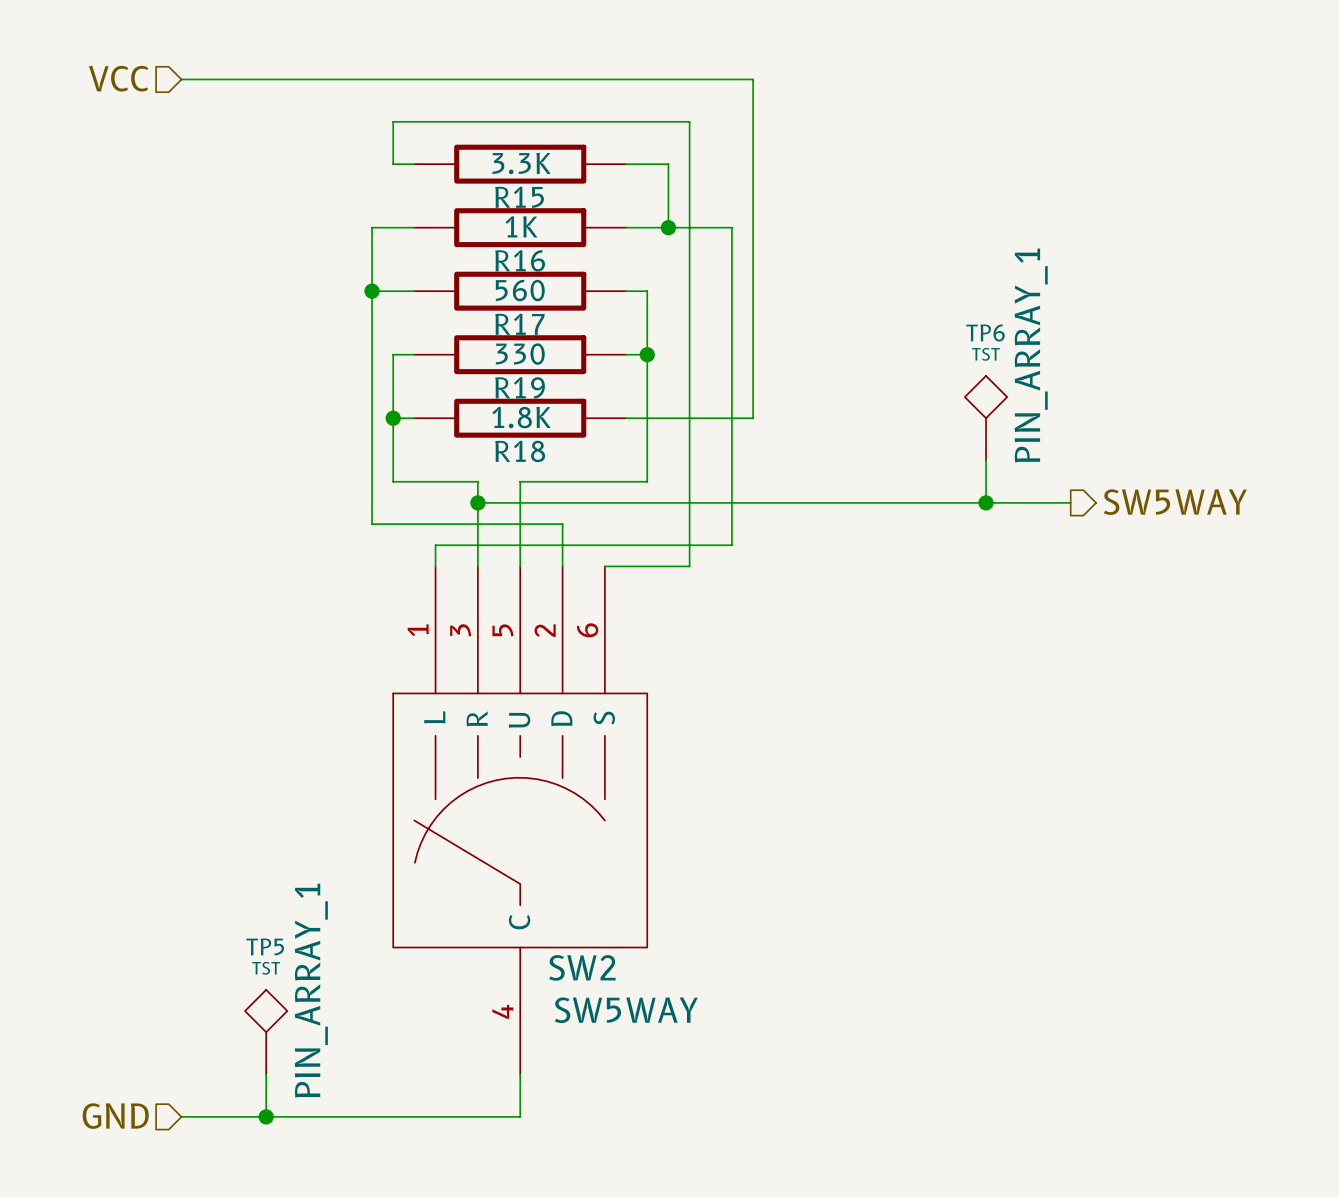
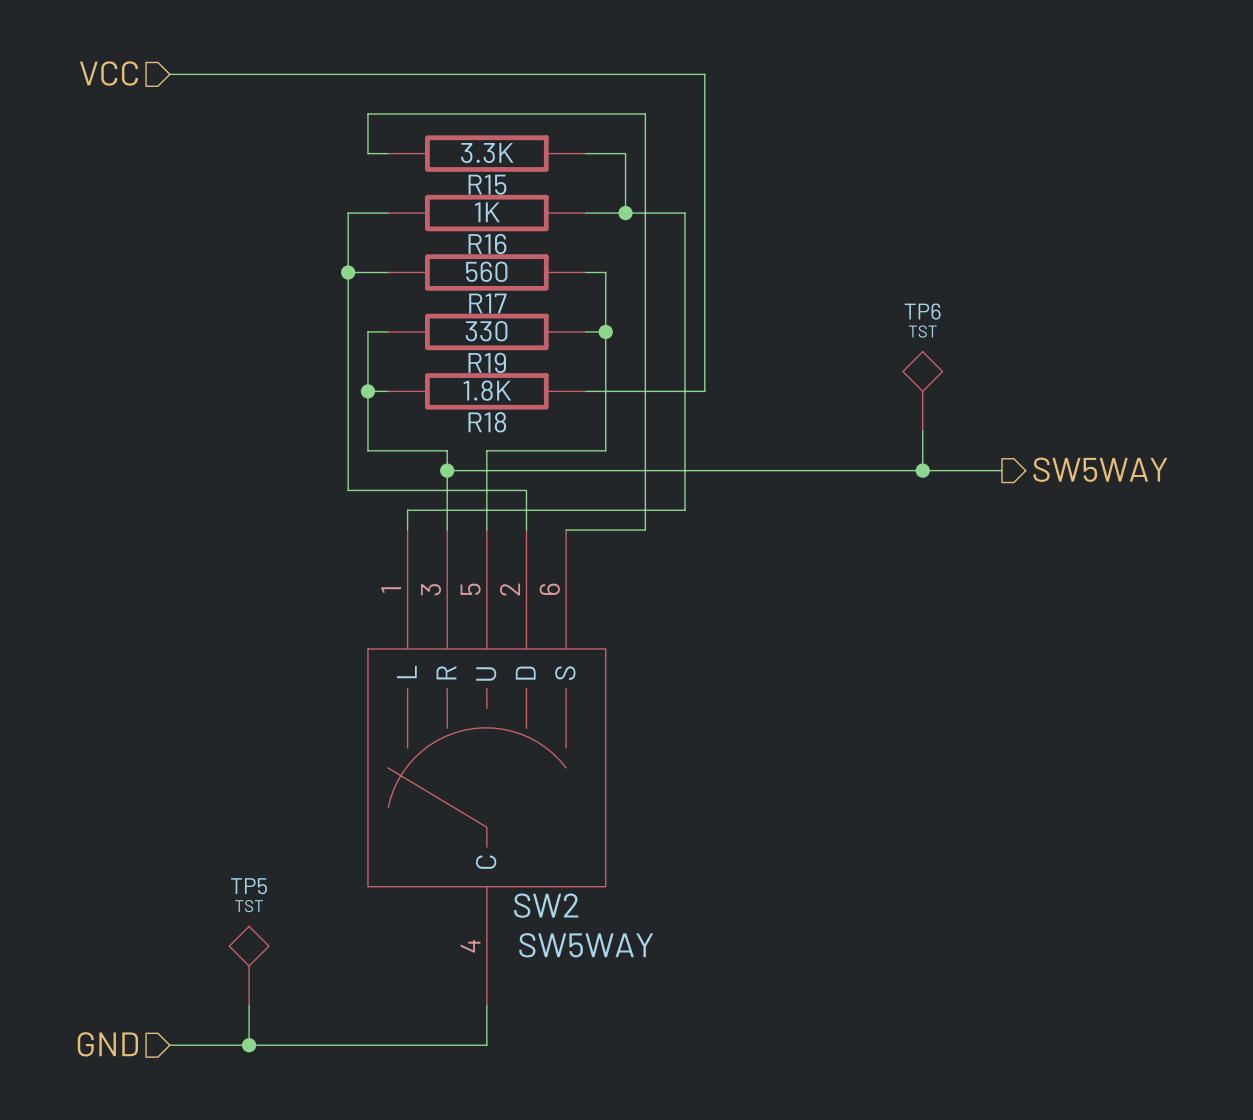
TP6 text: PIN_ARRAY_1 (1031, 355) -> none
TP5 text: PIN_ARRAY_1 (311, 990) -> none

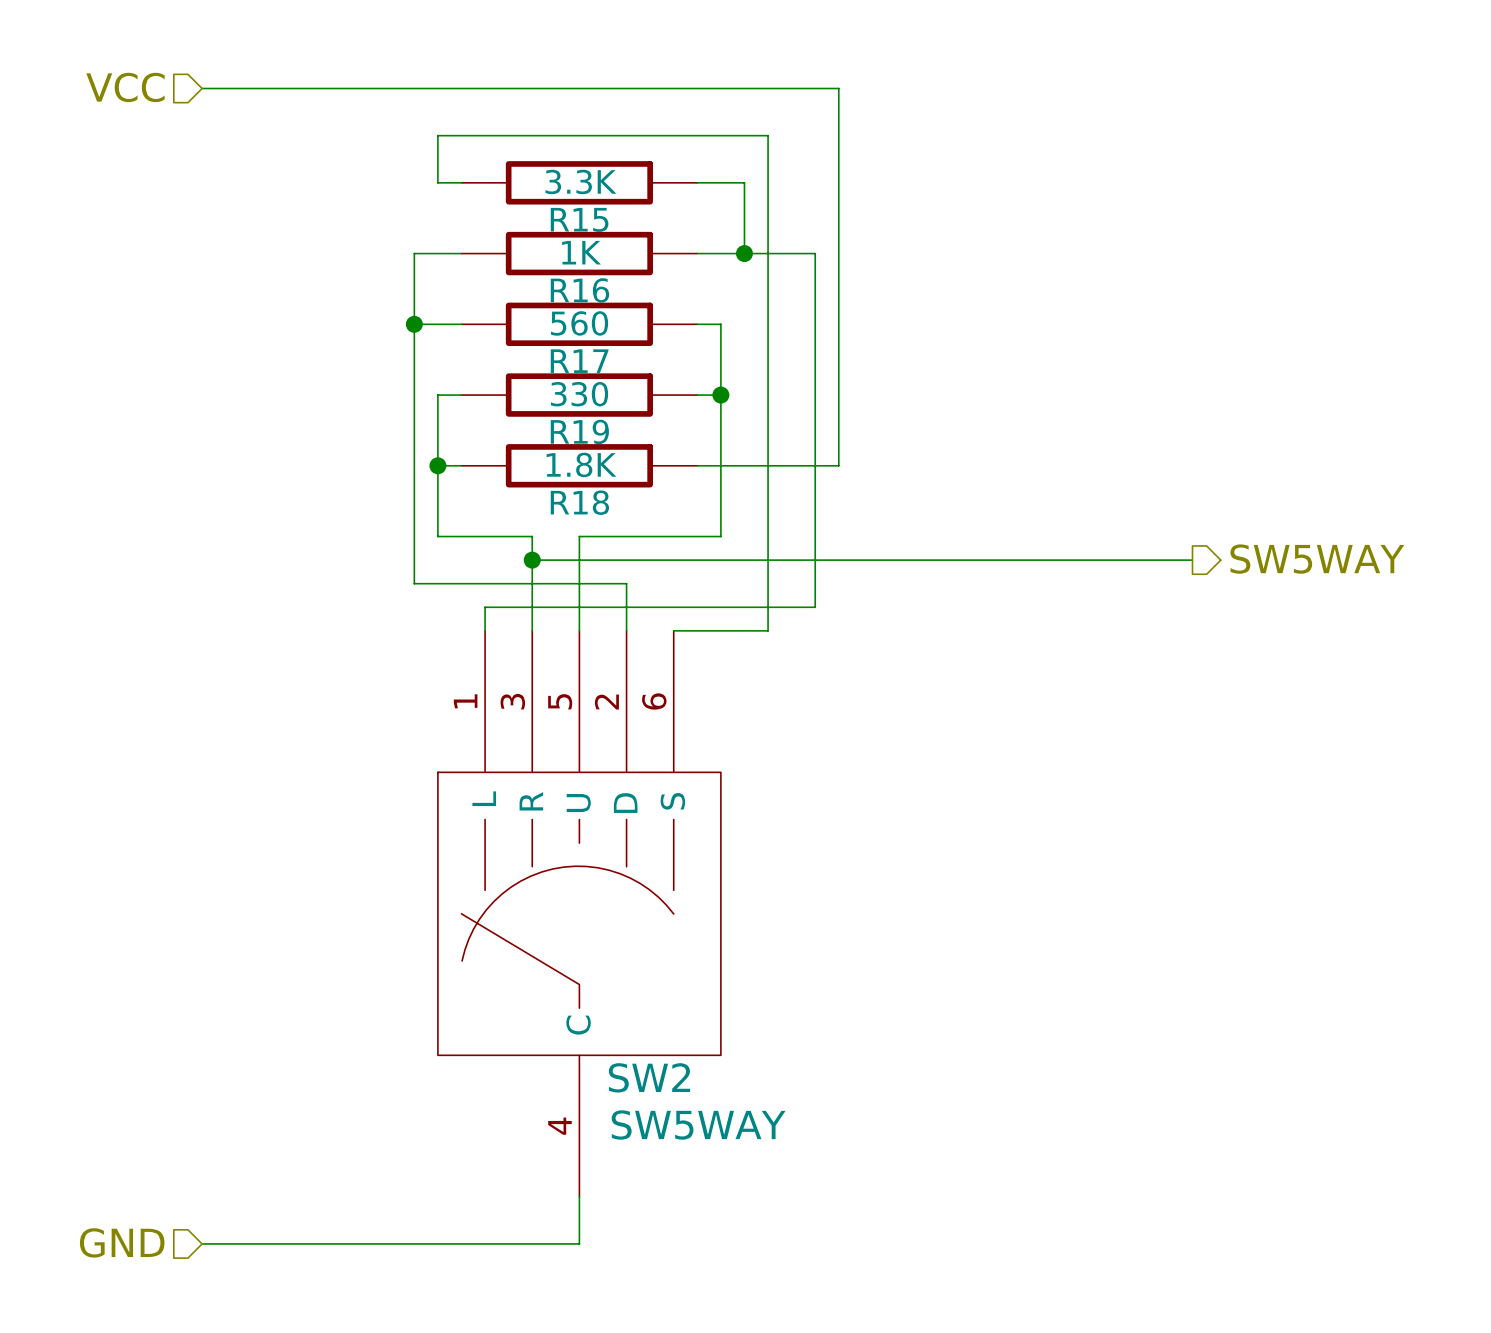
TP6: TST (922, 391) -> none
wire: (922, 431) (922, 470) -> none
junction: (922, 470) -> none
TP5: TST (249, 965) -> none
wire: (249, 1005) (249, 1045) -> none
junction: (249, 1045) -> none

